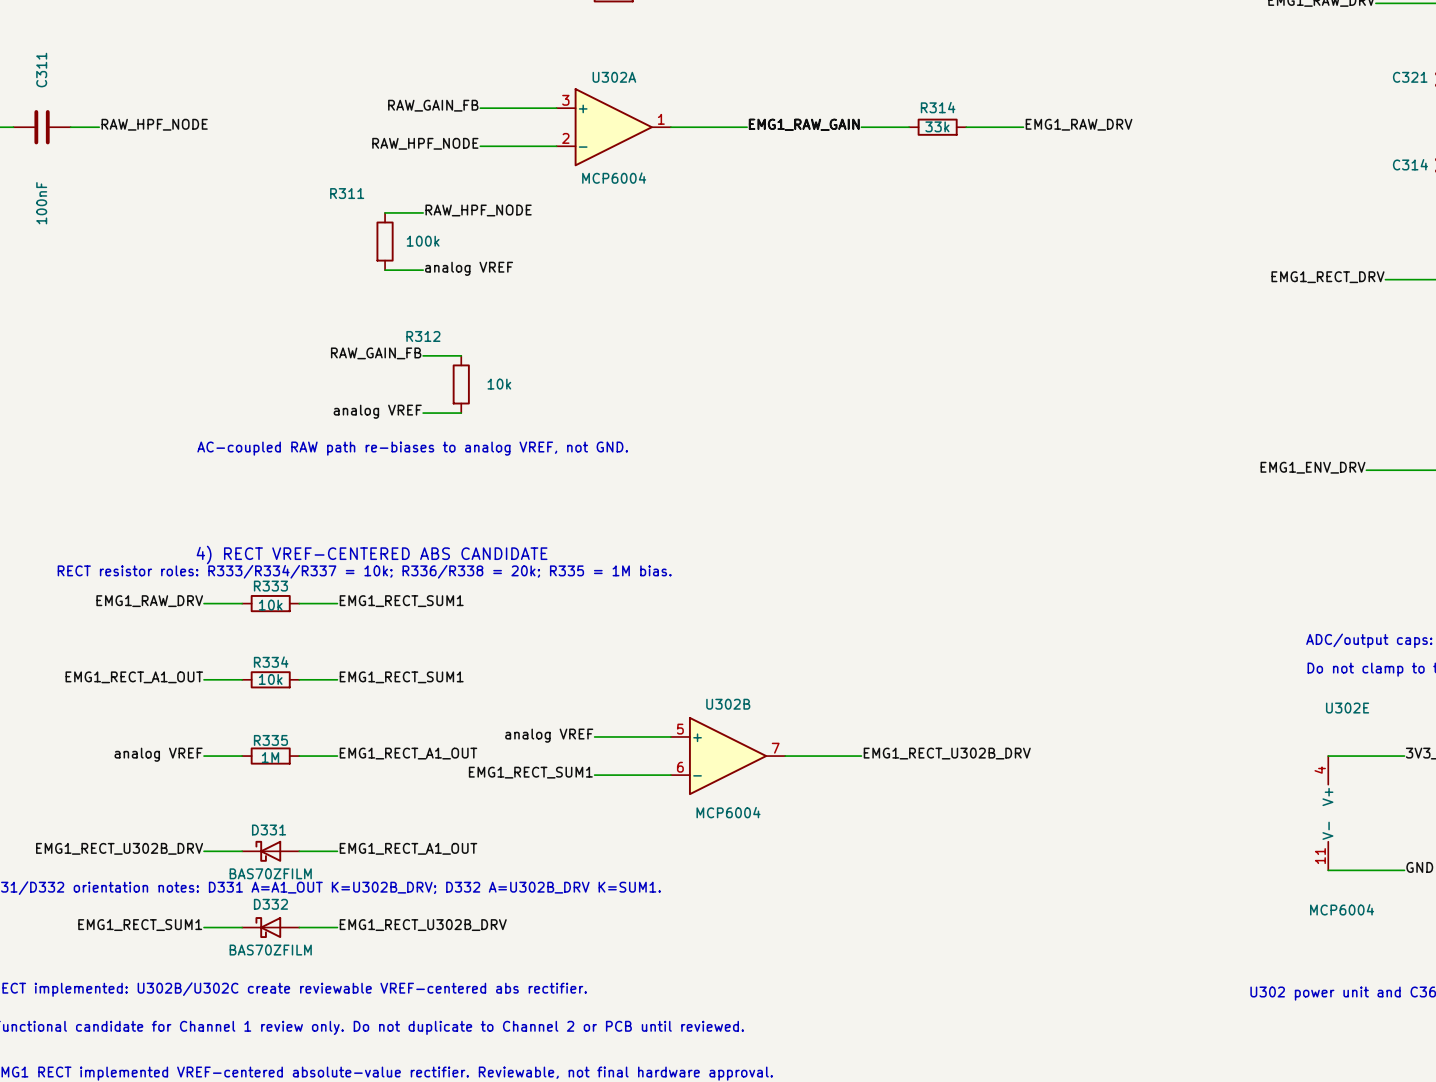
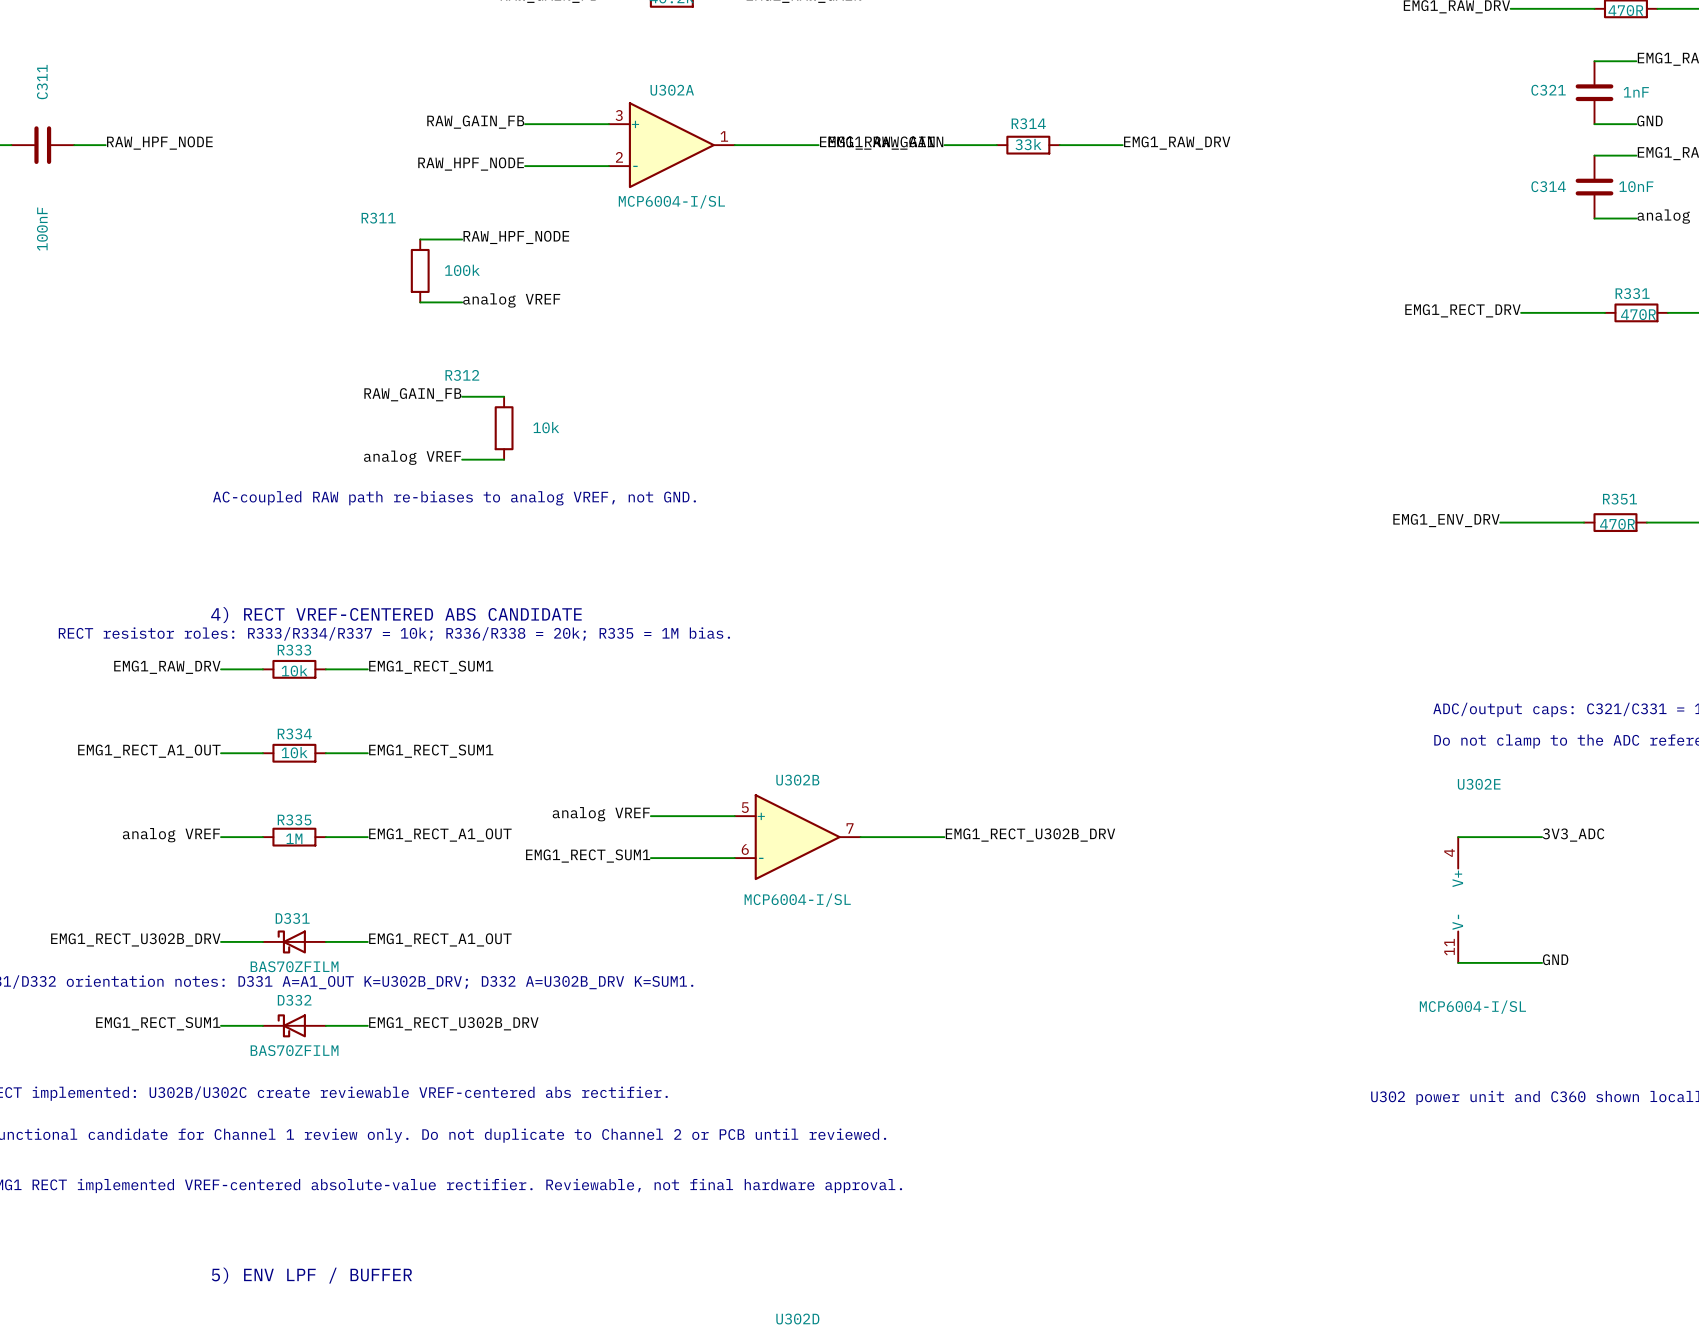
U302A value: MCP6004 (614, 178) -> MCP6004-I/SL (671, 201)
U302B value: MCP6004 (728, 812) -> MCP6004-I/SL (797, 900)
U302E value: MCP6004 (1342, 909) -> MCP6004-I/SL (1472, 1007)

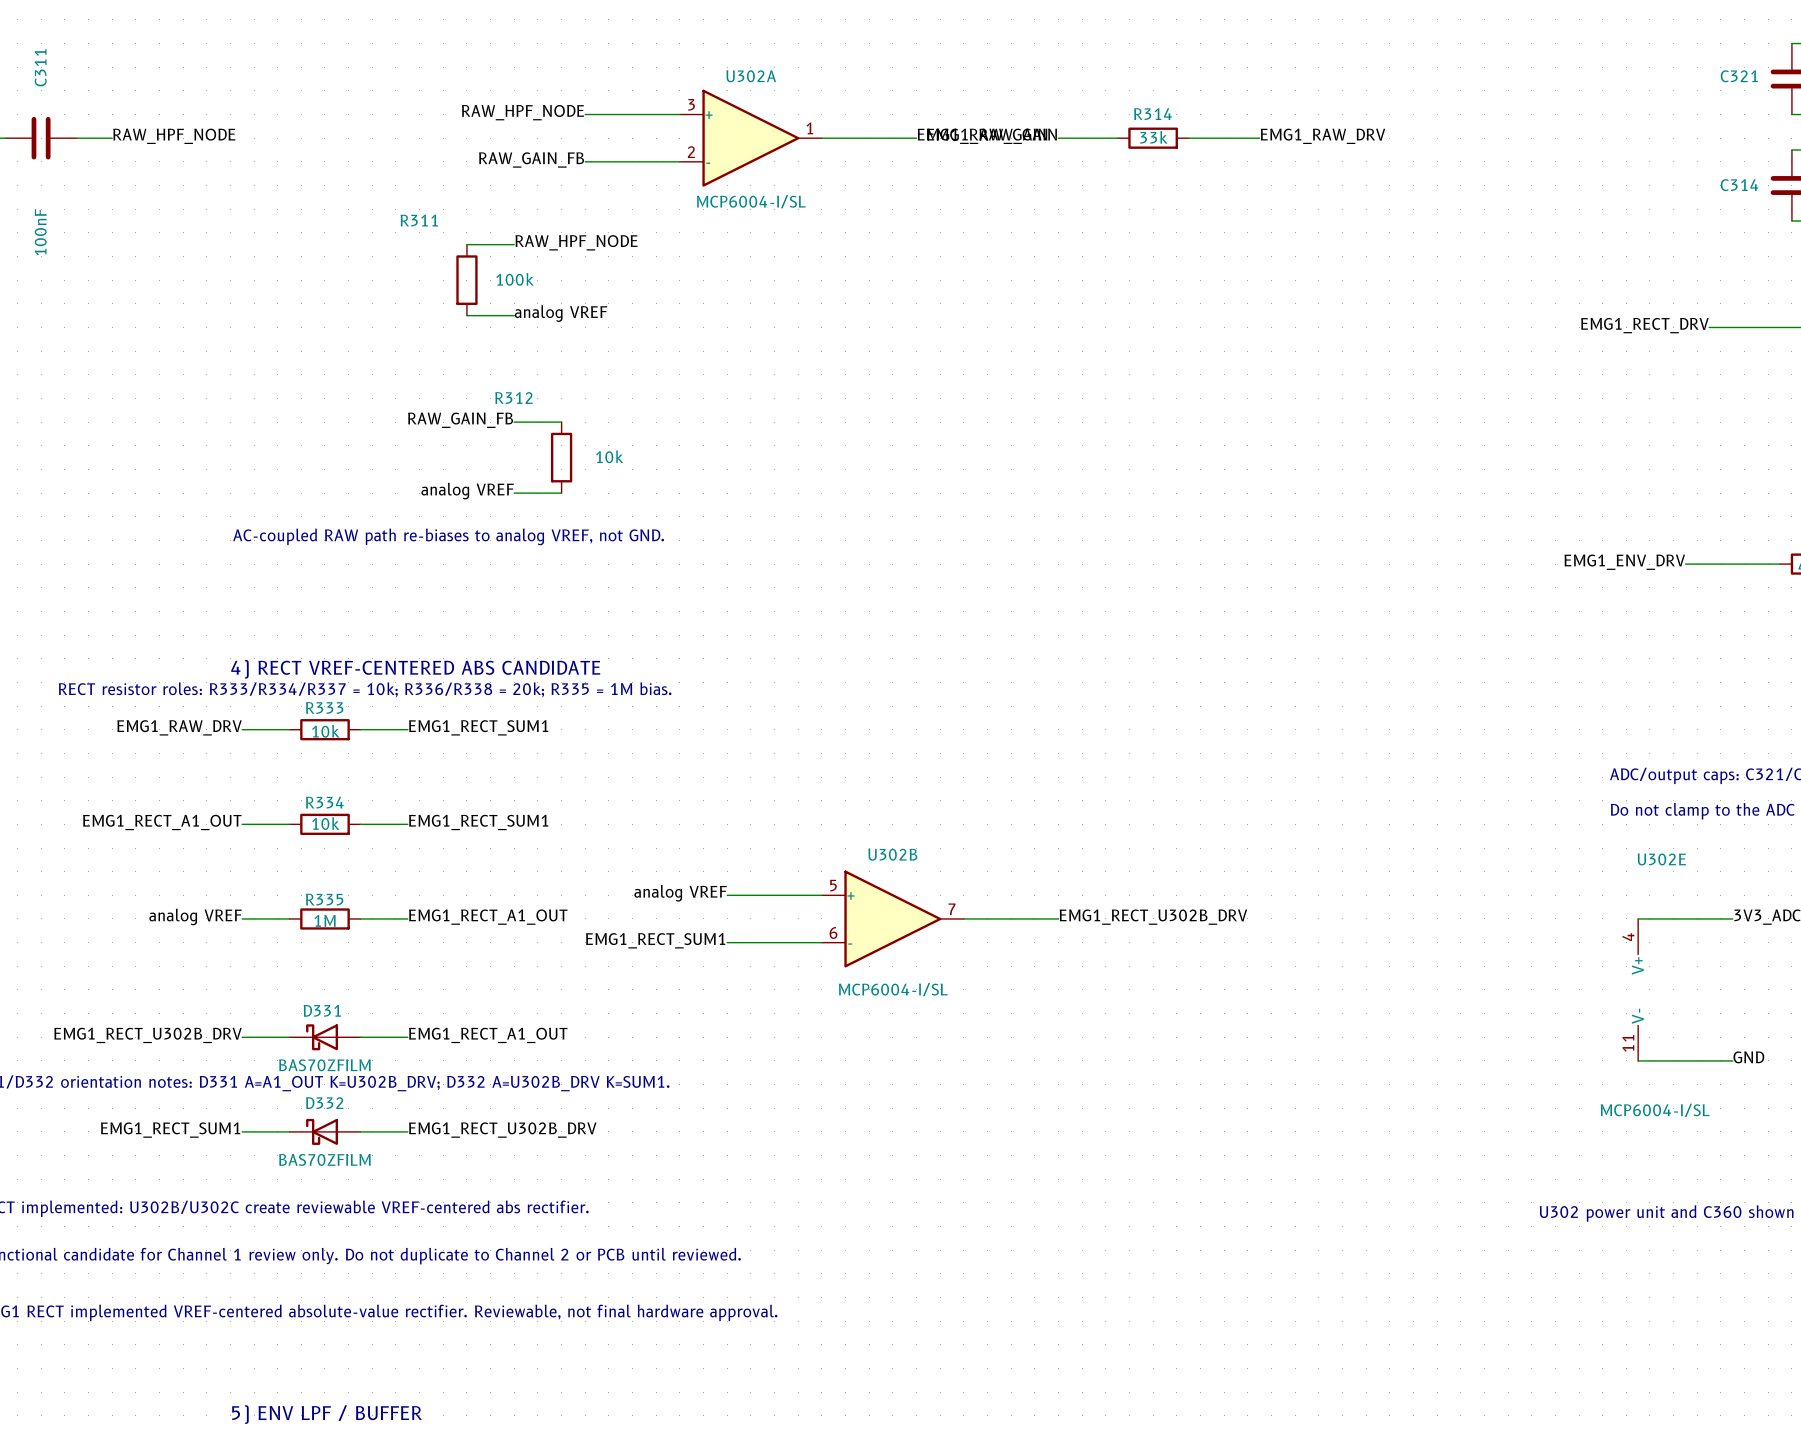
label: RAW_GAIN_FB (475, 122) -> RAW_HPF_NODE (522, 112)
label: RAW_HPF_NODE (471, 164) -> RAW_GAIN_FB (531, 159)

